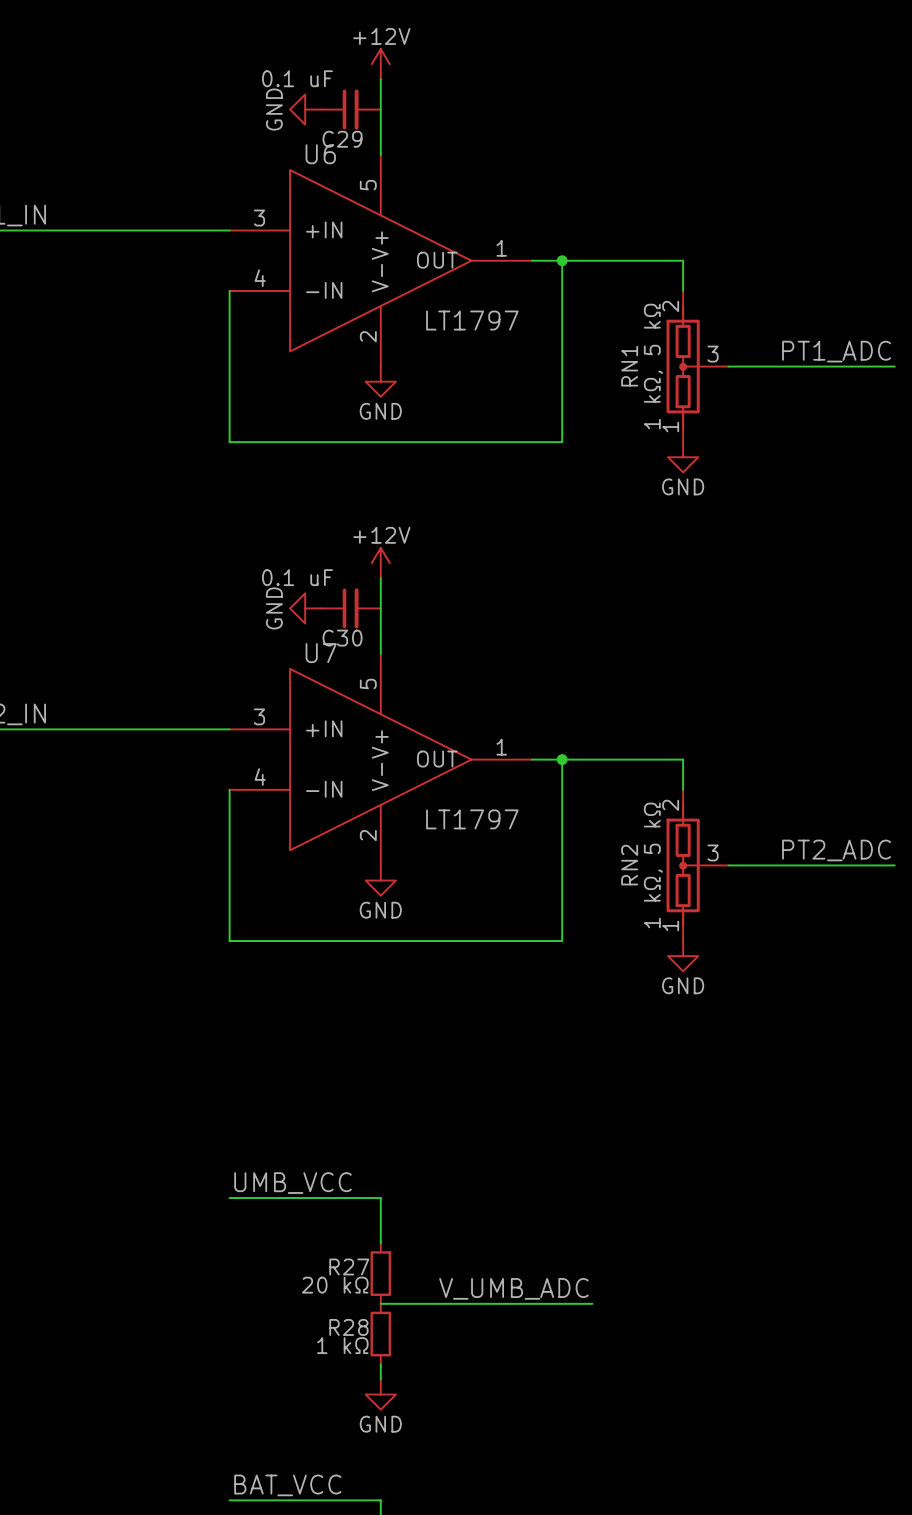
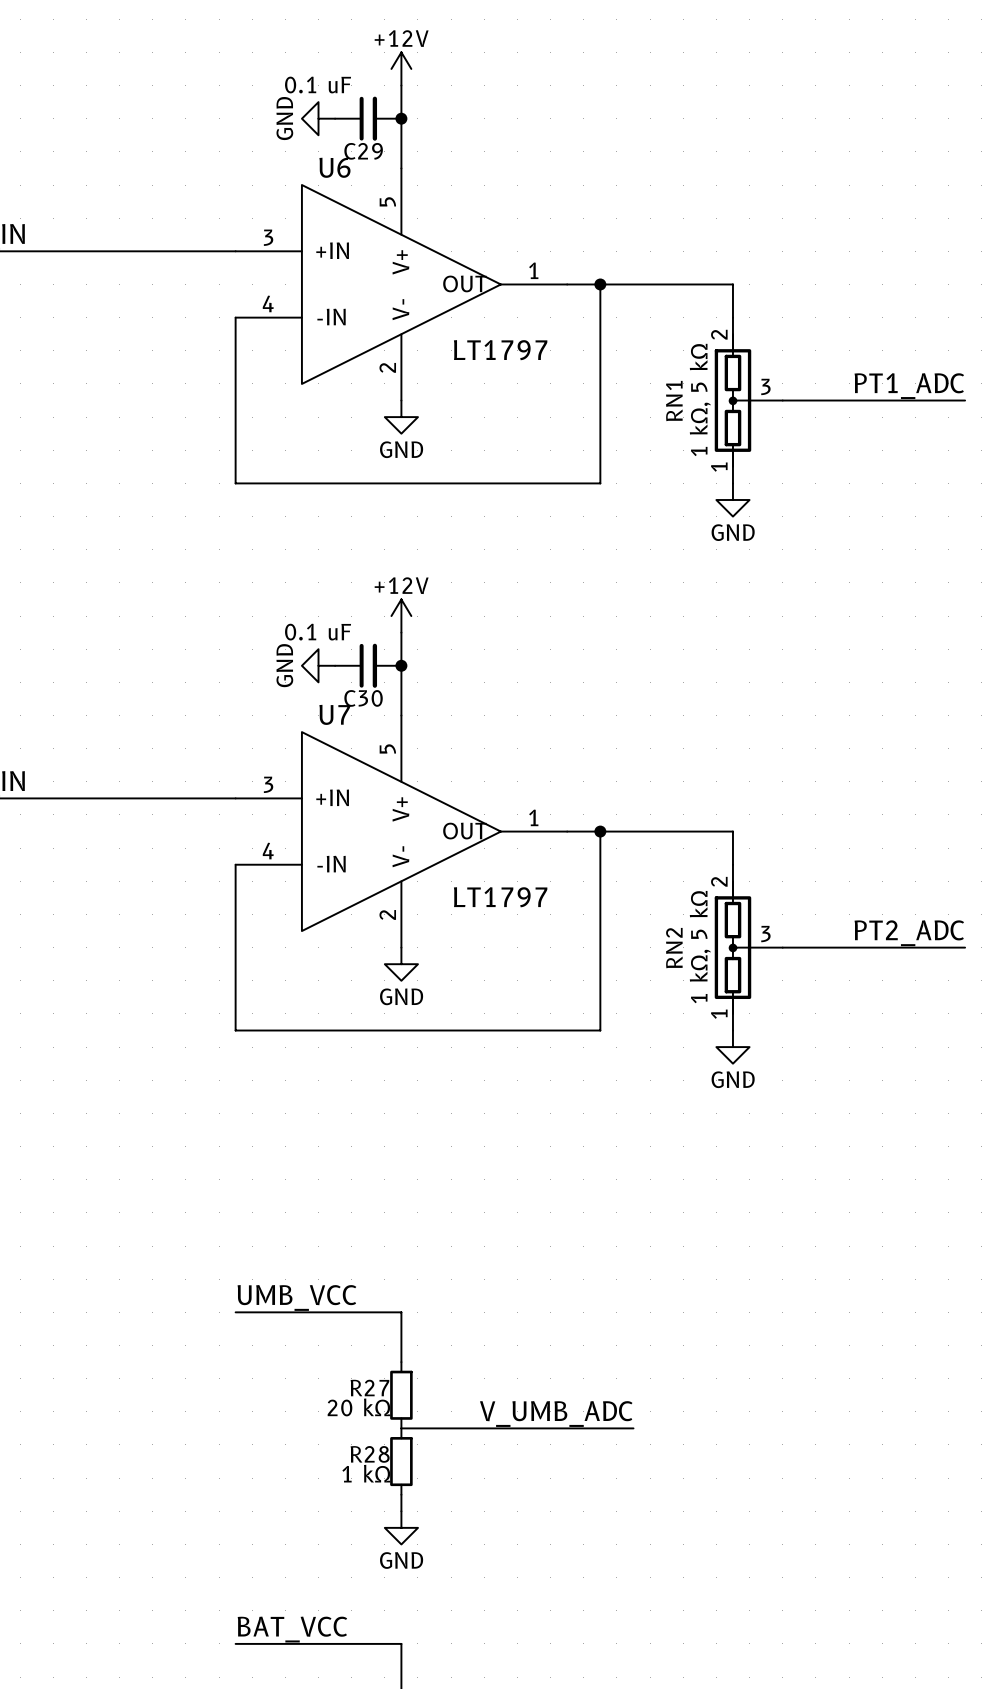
junction: none -> (401, 118)
junction: none -> (401, 665)

